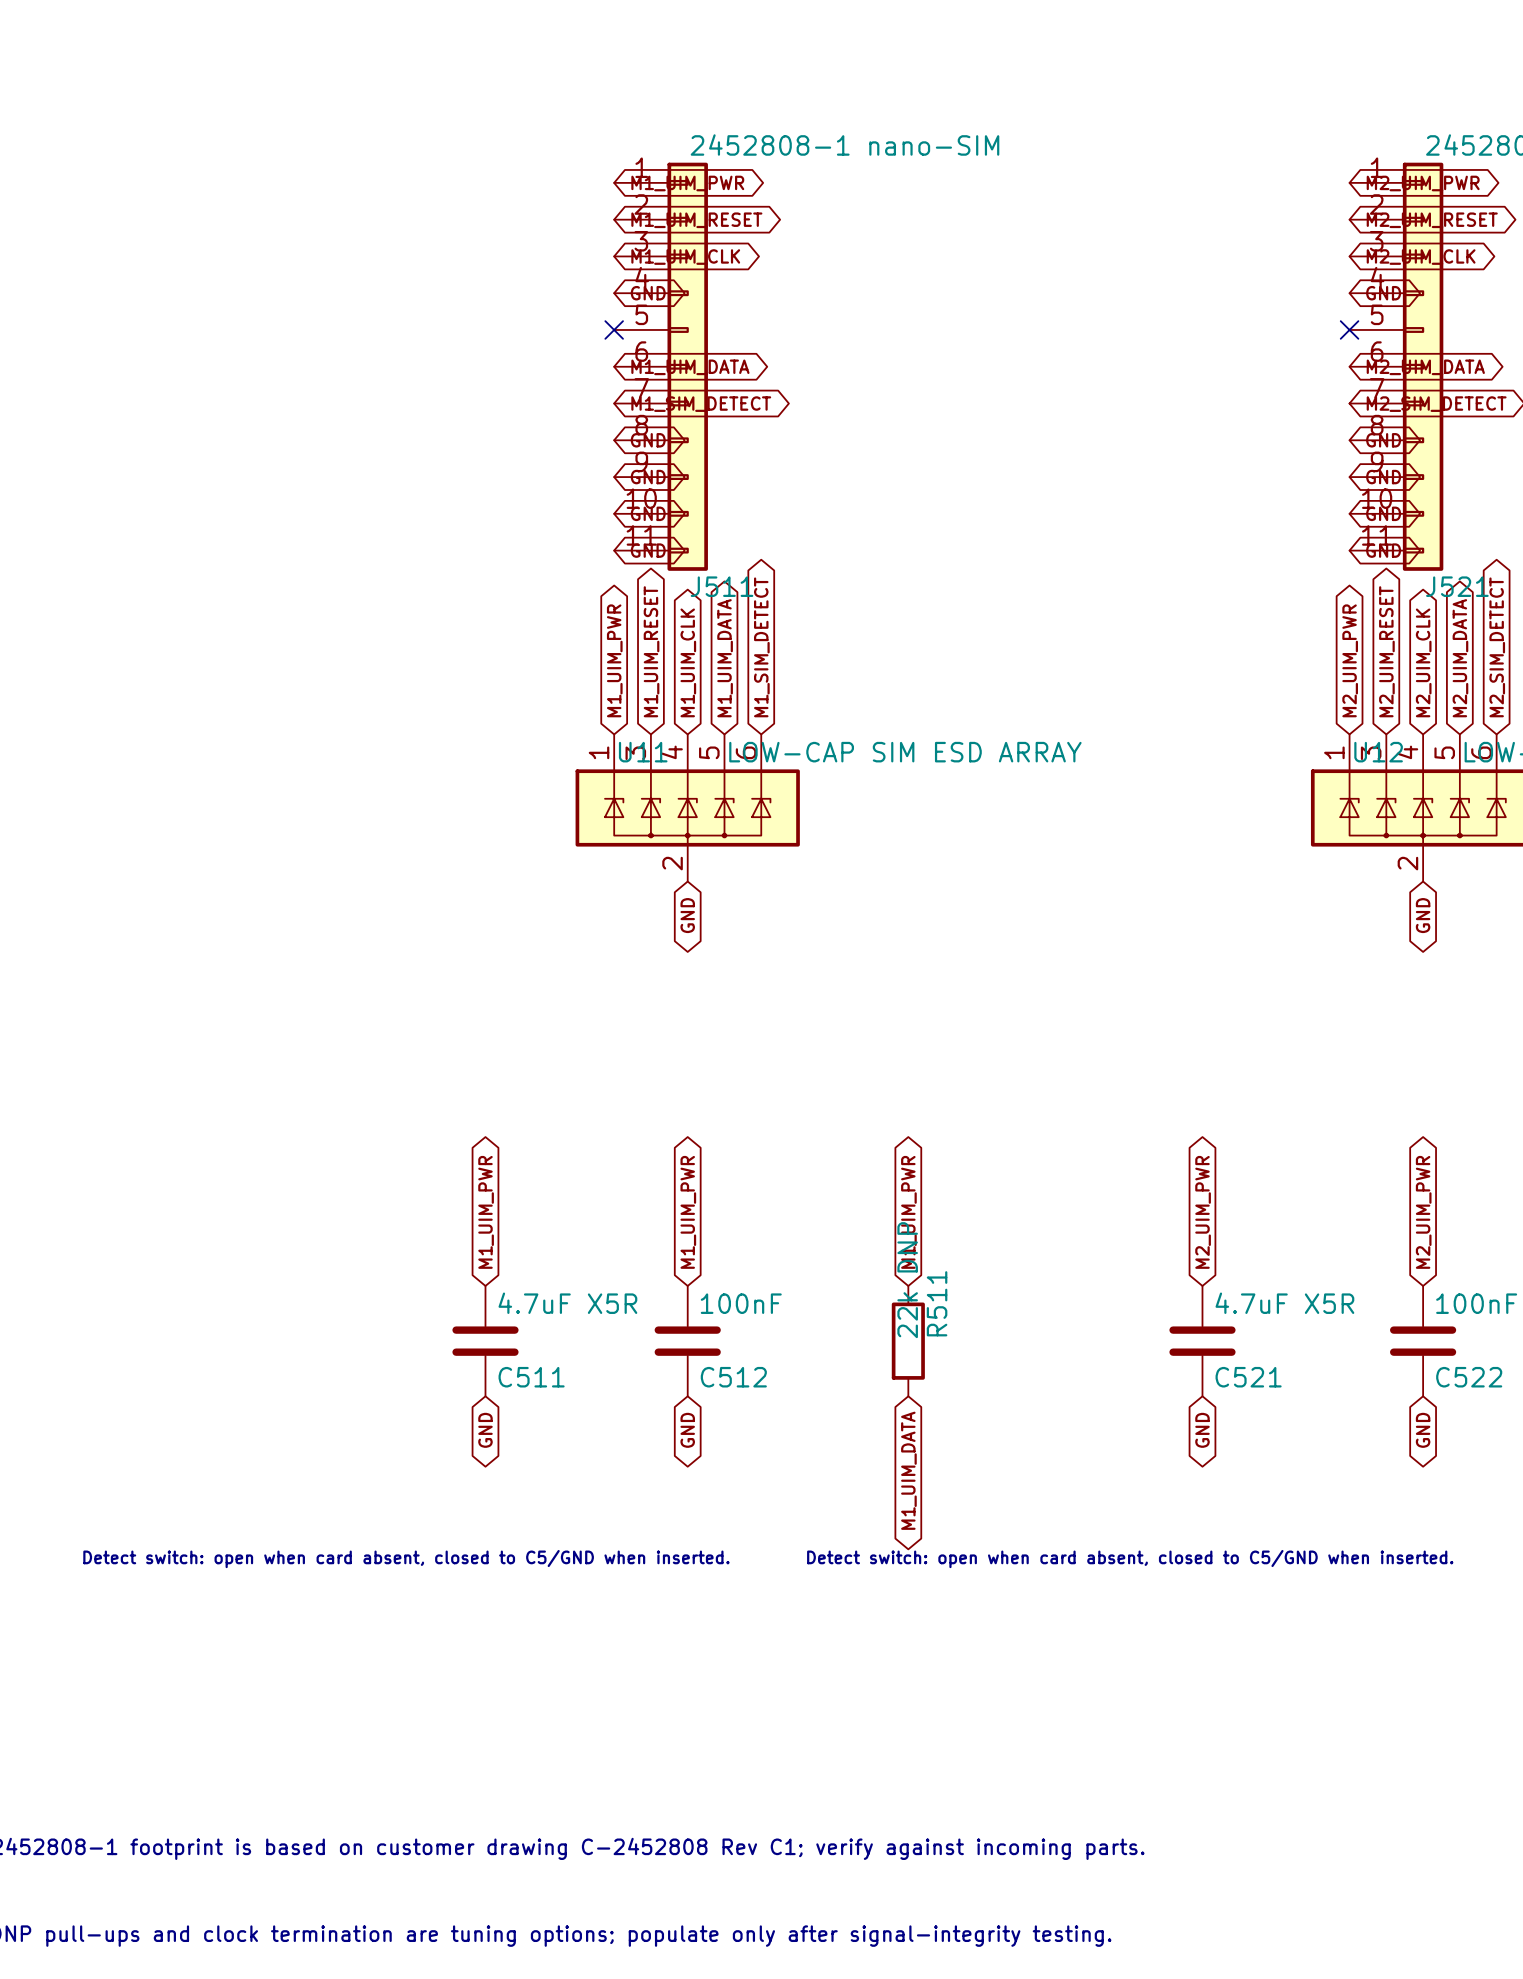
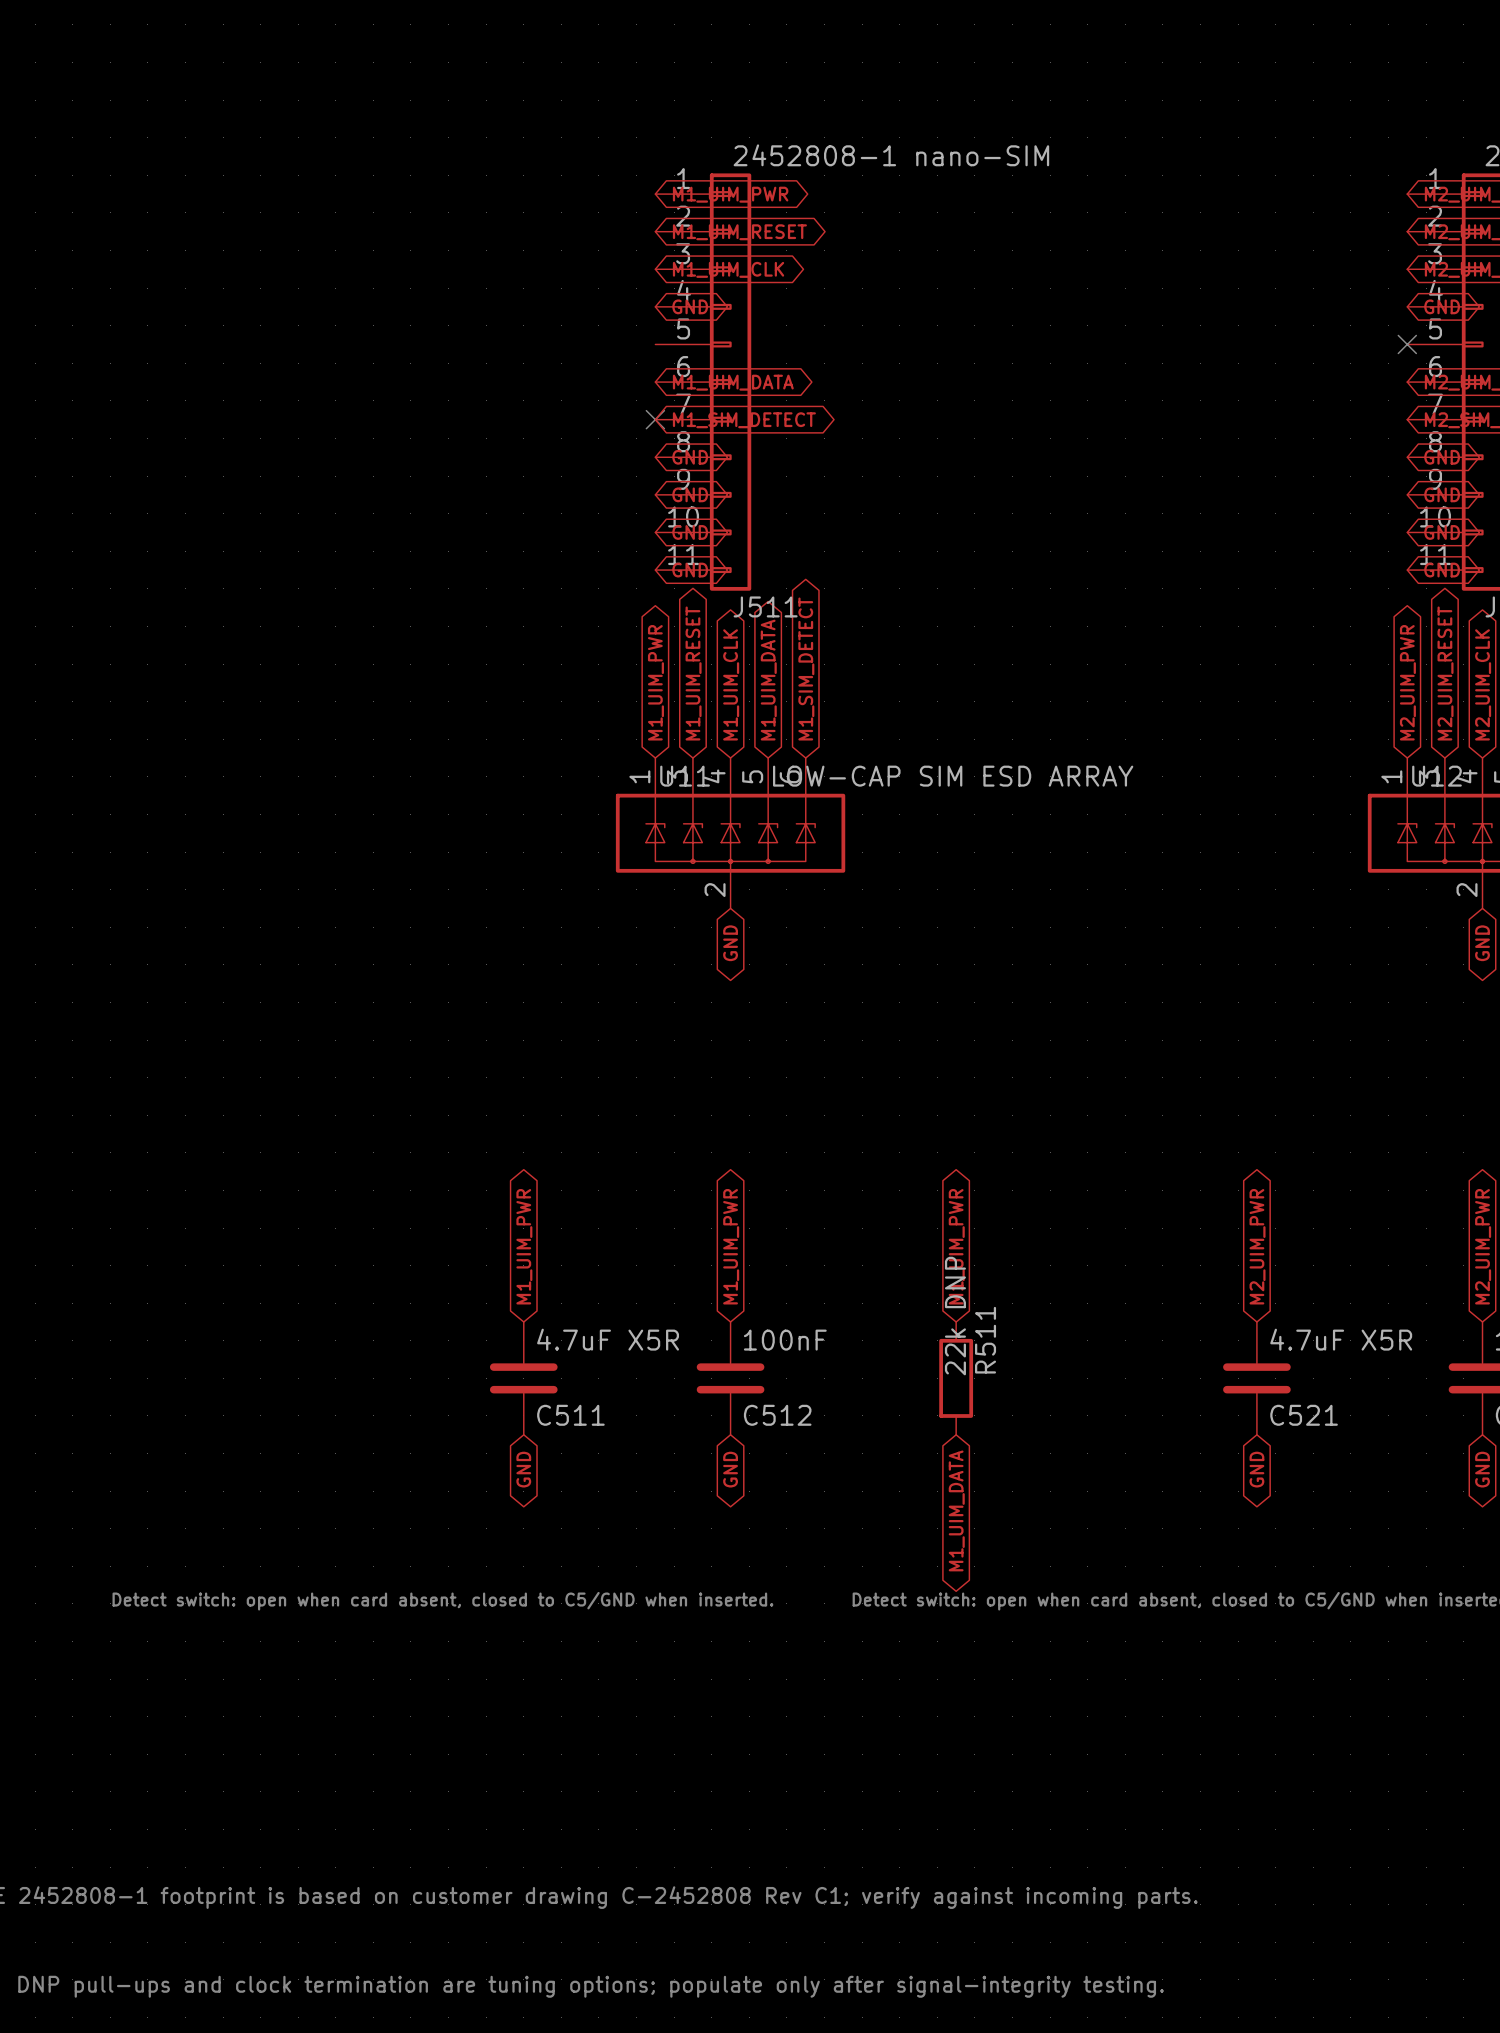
no-connect mark position: (614, 329) -> (655, 419)

